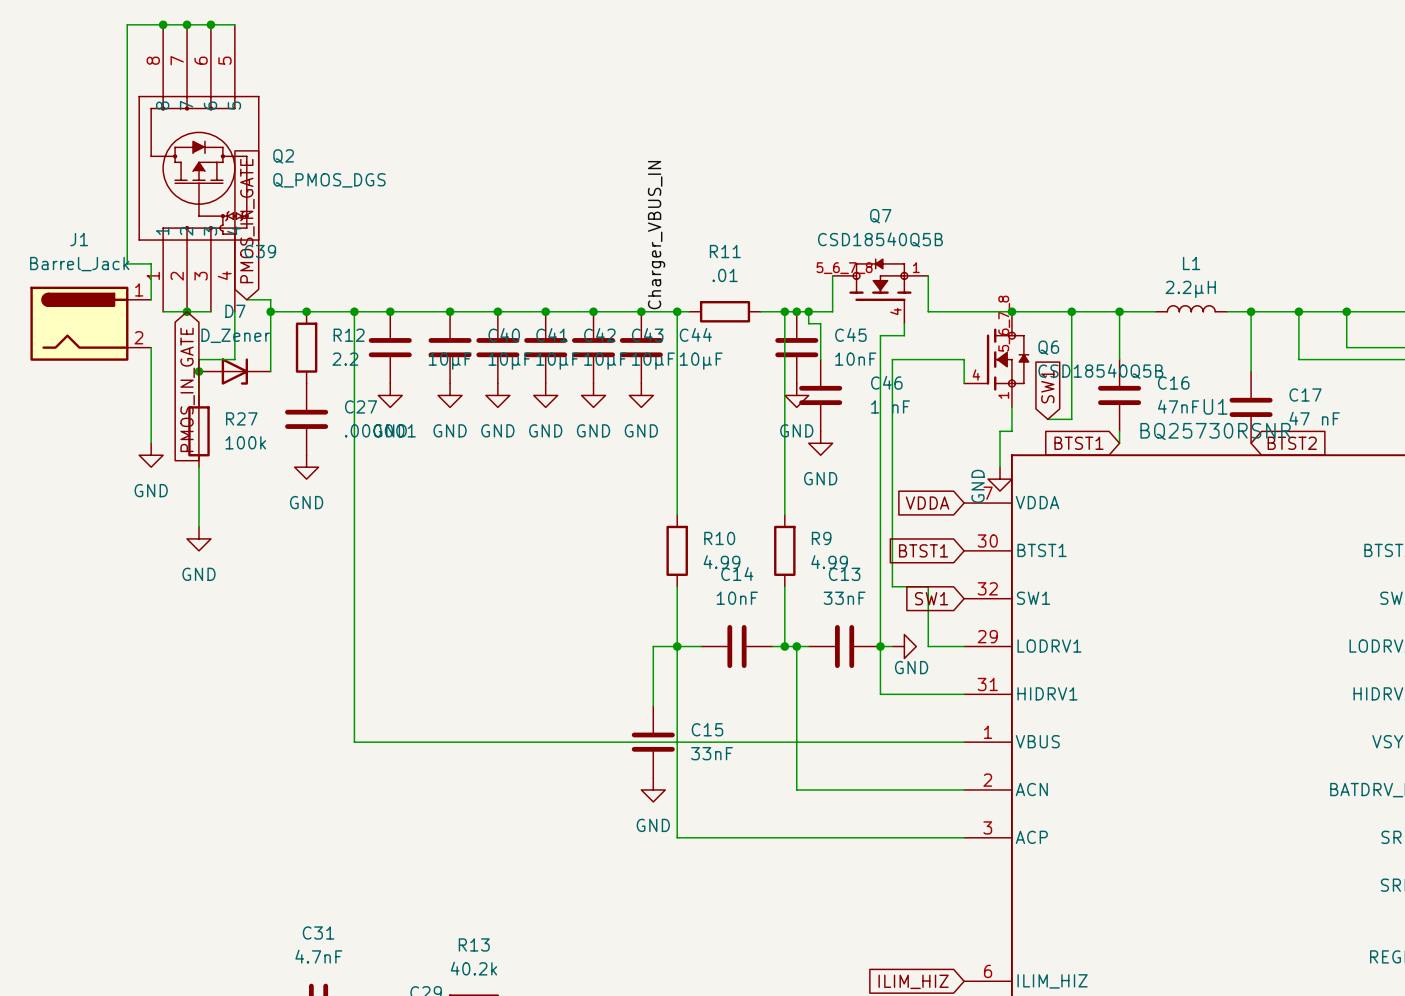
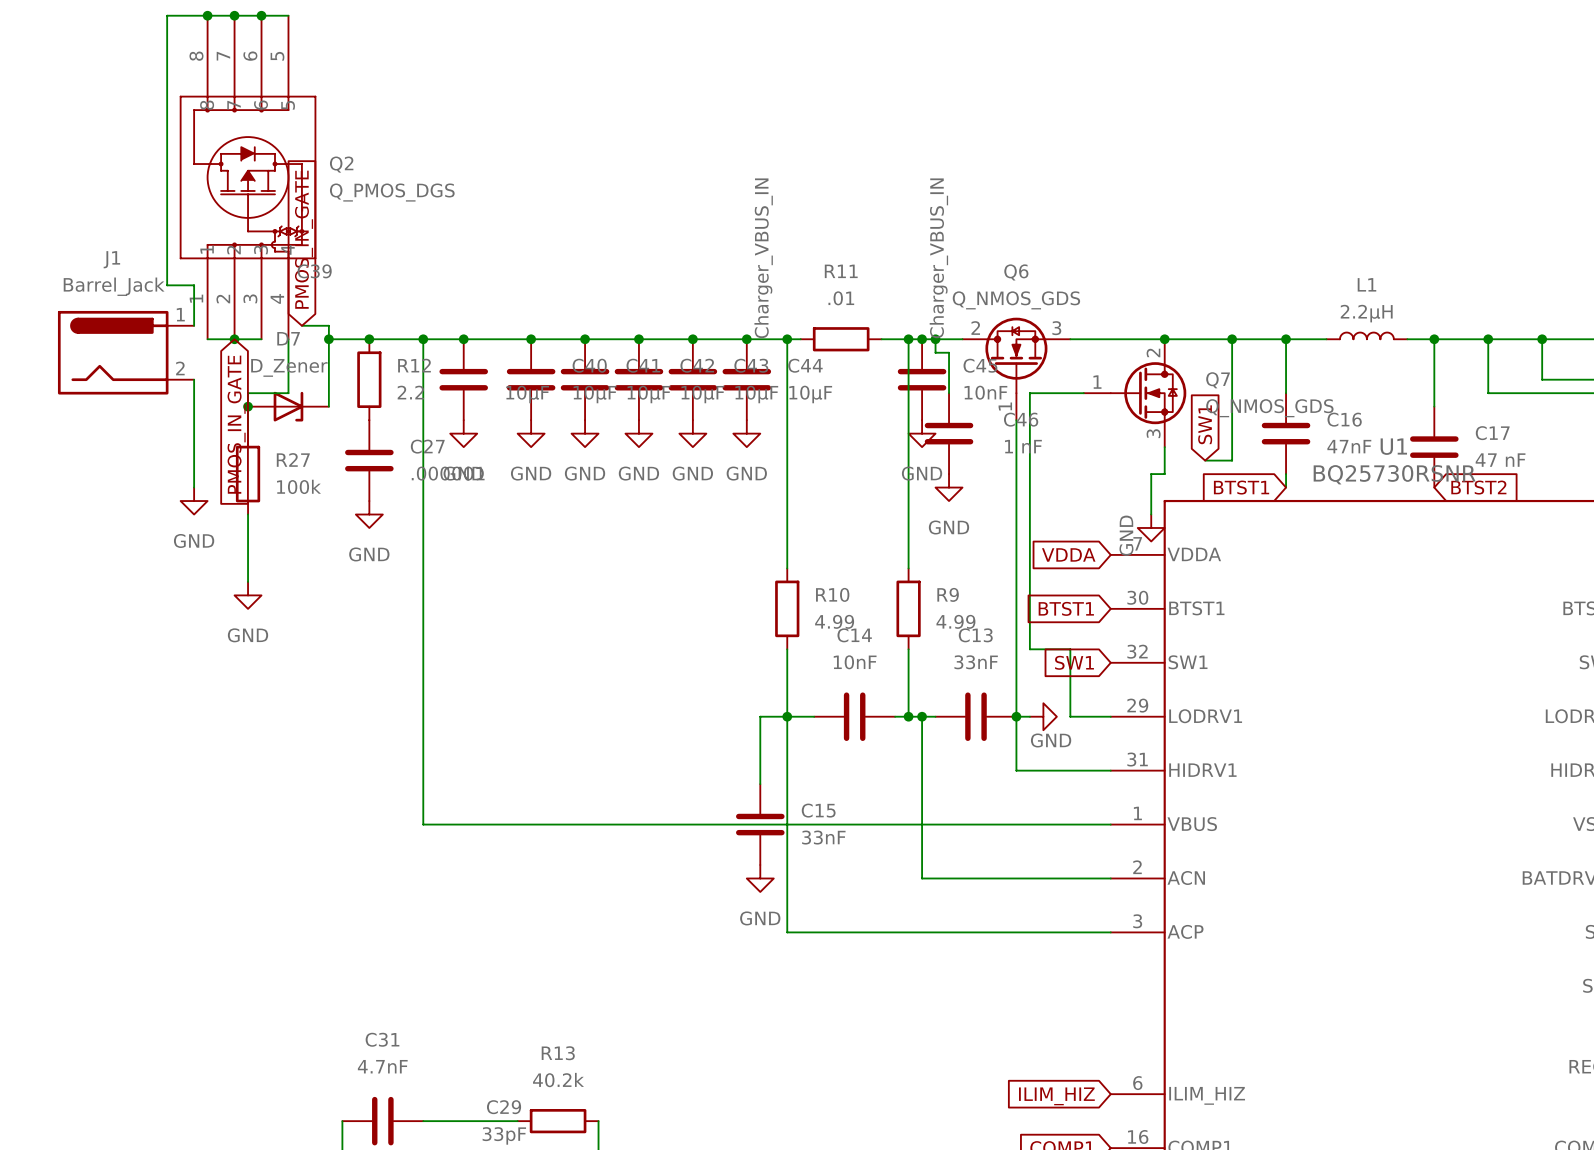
Q7 name position: Q7 (880, 216) -> Q7 (1218, 380)
label: none -> Charger_VBUS_IN (938, 258)
Q7 value: CSD18540Q5B (880, 239) -> Q_NMOS_GDS (1269, 408)
Q7 symbol: [832, 258, 929, 324] -> [1083, 339, 1187, 448]
wire: (832, 275) (832, 311) -> none
wire: (928, 275) (928, 311) -> none
Q6 symbol: [964, 311, 1030, 408] -> [962, 317, 1071, 421]
Q6 name position: Q6 (1048, 347) -> Q6 (1016, 272)
wire: (940, 359) (964, 359) (964, 383) -> none
Q6 value: CSD18540Q5B (1100, 371) -> Q_NMOS_GDS (1016, 300)

